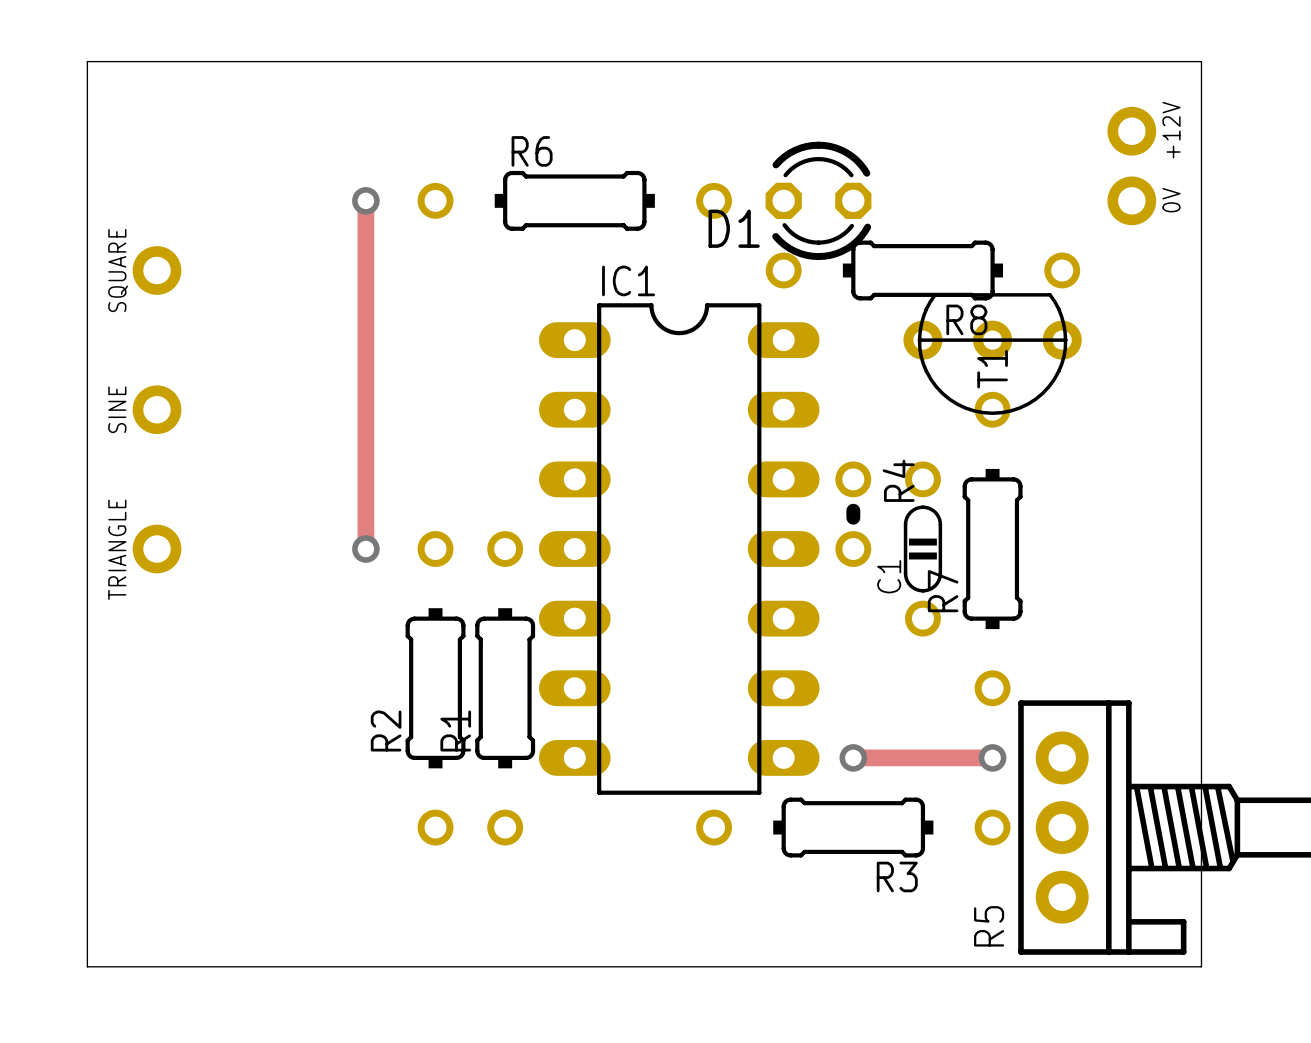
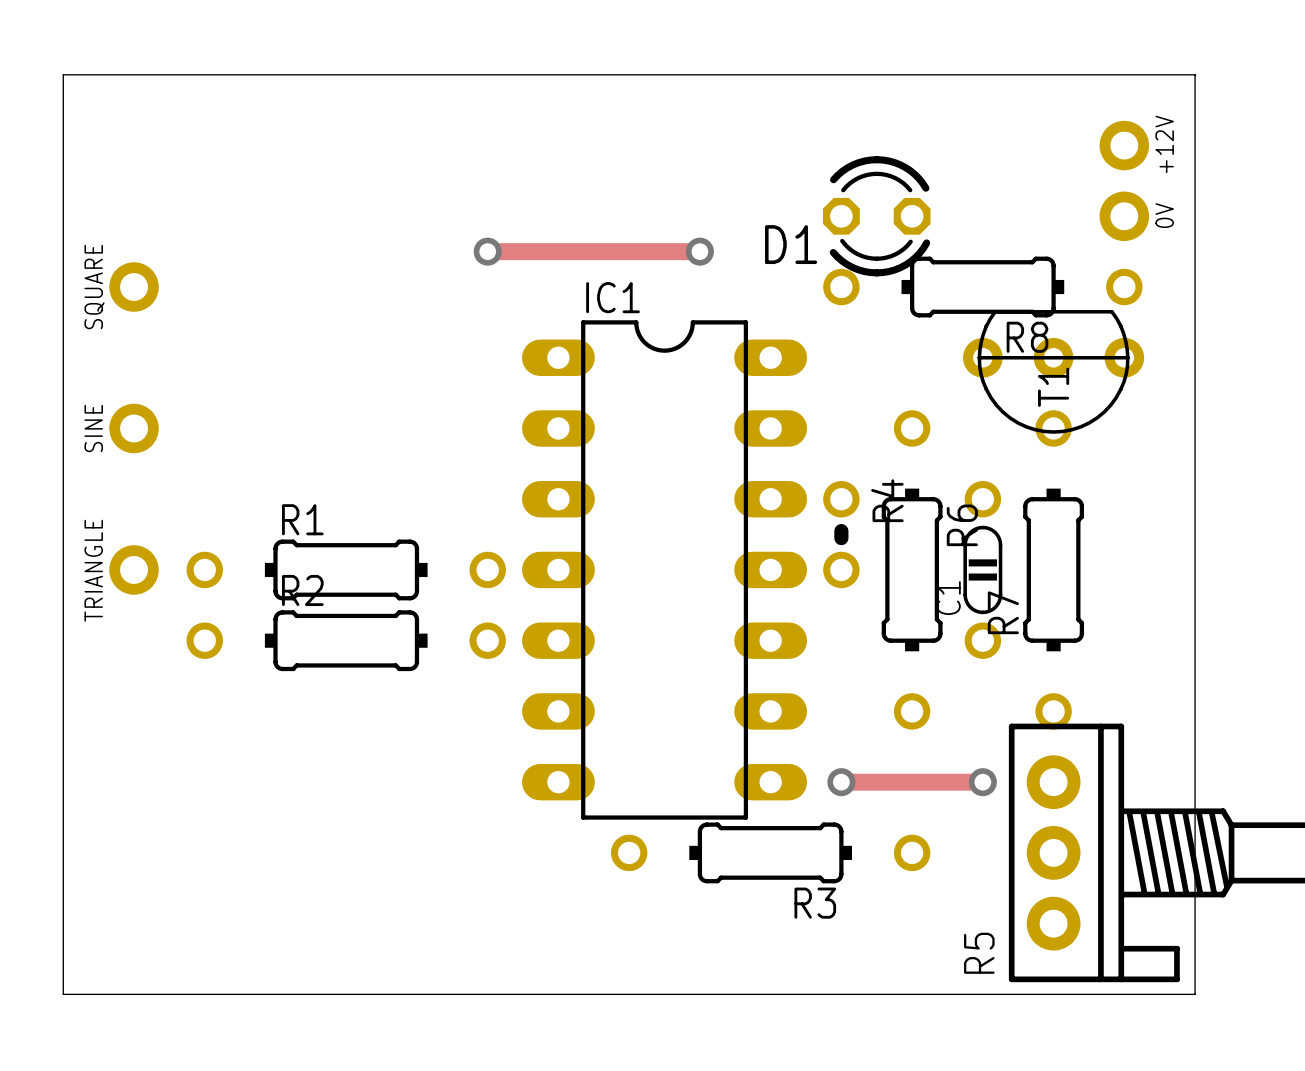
track: (365, 200) (365, 549) -> none
via position: (365, 200) -> (487, 251)
R6 rotation: 0° (574, 200) -> 90° clockwise (912, 569)
R6 position: (574, 200) -> (912, 569)
D1 position: (818, 200) -> (876, 216)
track: none -> (487, 251) (699, 251)
via: none -> (699, 251)
R8 position: (922, 270) -> (982, 287)
T1 position: (992, 354) -> (1053, 371)
via: (365, 549) -> none
C1 position: (922, 549) -> (982, 569)
R7 position: (992, 549) -> (1053, 569)
R2 rotation: 0° (435, 688) -> 90° clockwise (346, 640)
R1 rotation: 0° (505, 688) -> 90° clockwise (346, 569)
R1 position: (505, 688) -> (346, 569)
R3 position: (853, 827) -> (770, 852)

